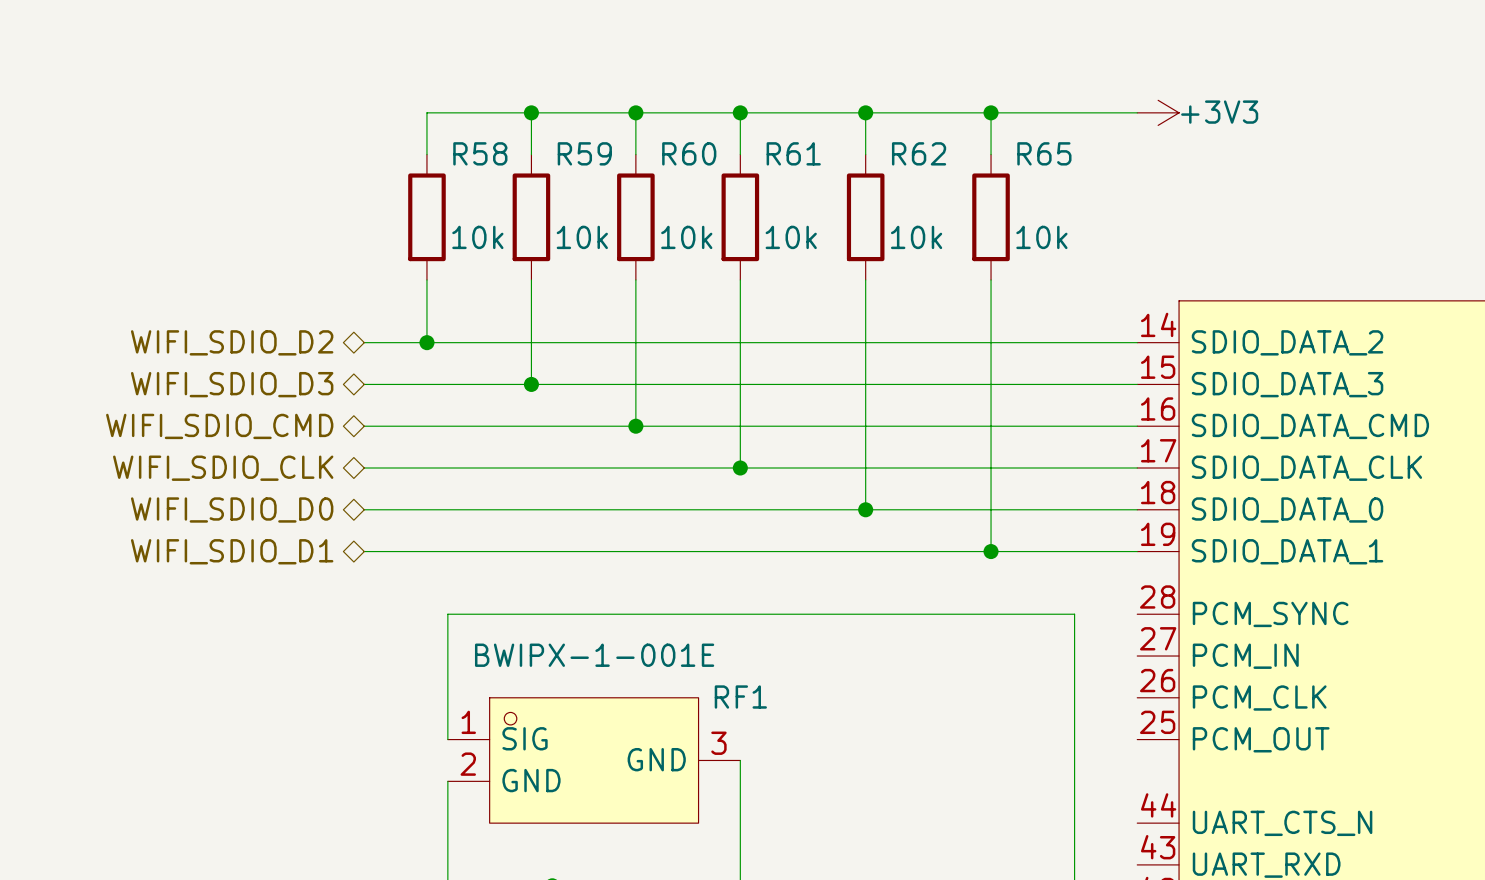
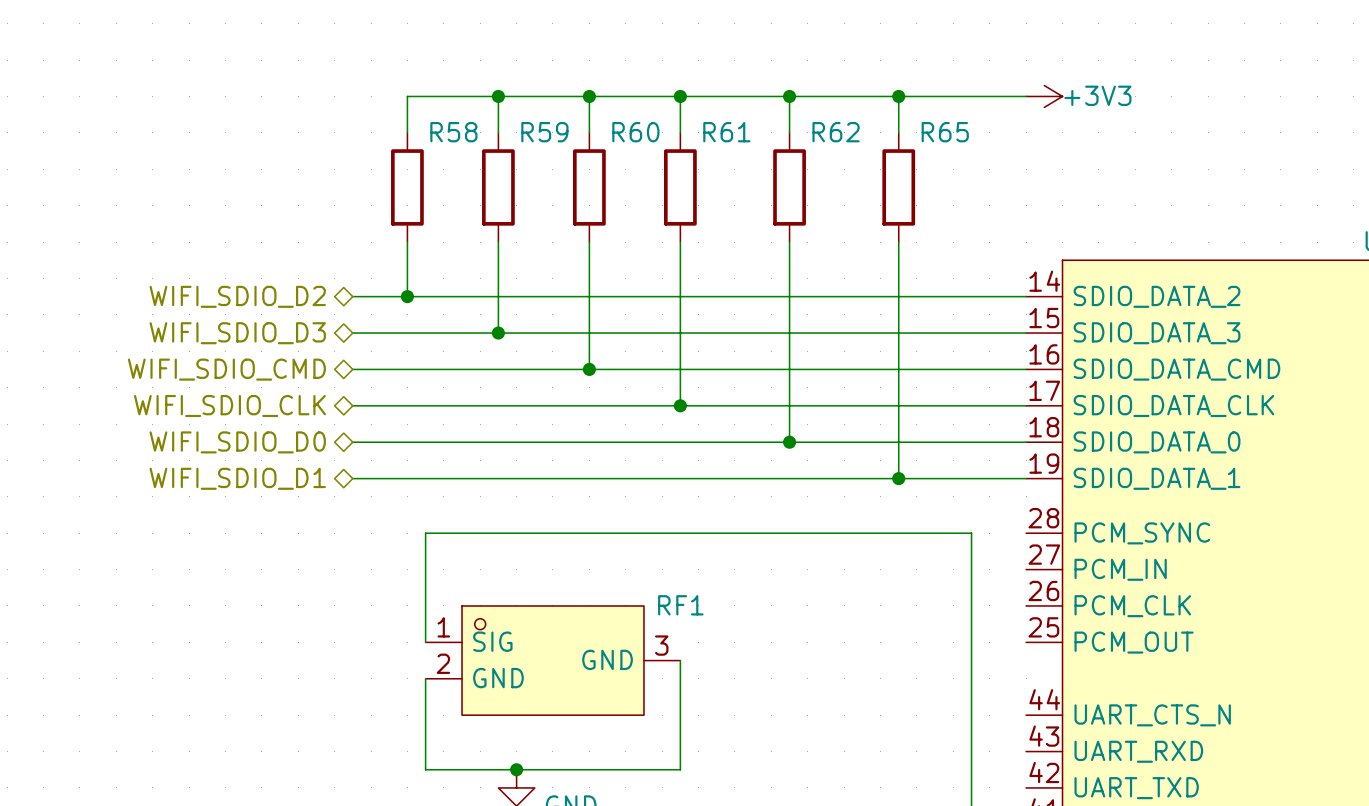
R58 value: 10k (477, 237) -> none
R59 value: 10k (582, 237) -> none
R60 value: 10k (686, 237) -> none
R61 value: 10k (791, 237) -> none
R62 value: 10k (916, 237) -> none
R65 value: 10k (1041, 237) -> none
RF1 value: BWIPX-1-001E (594, 655) -> none

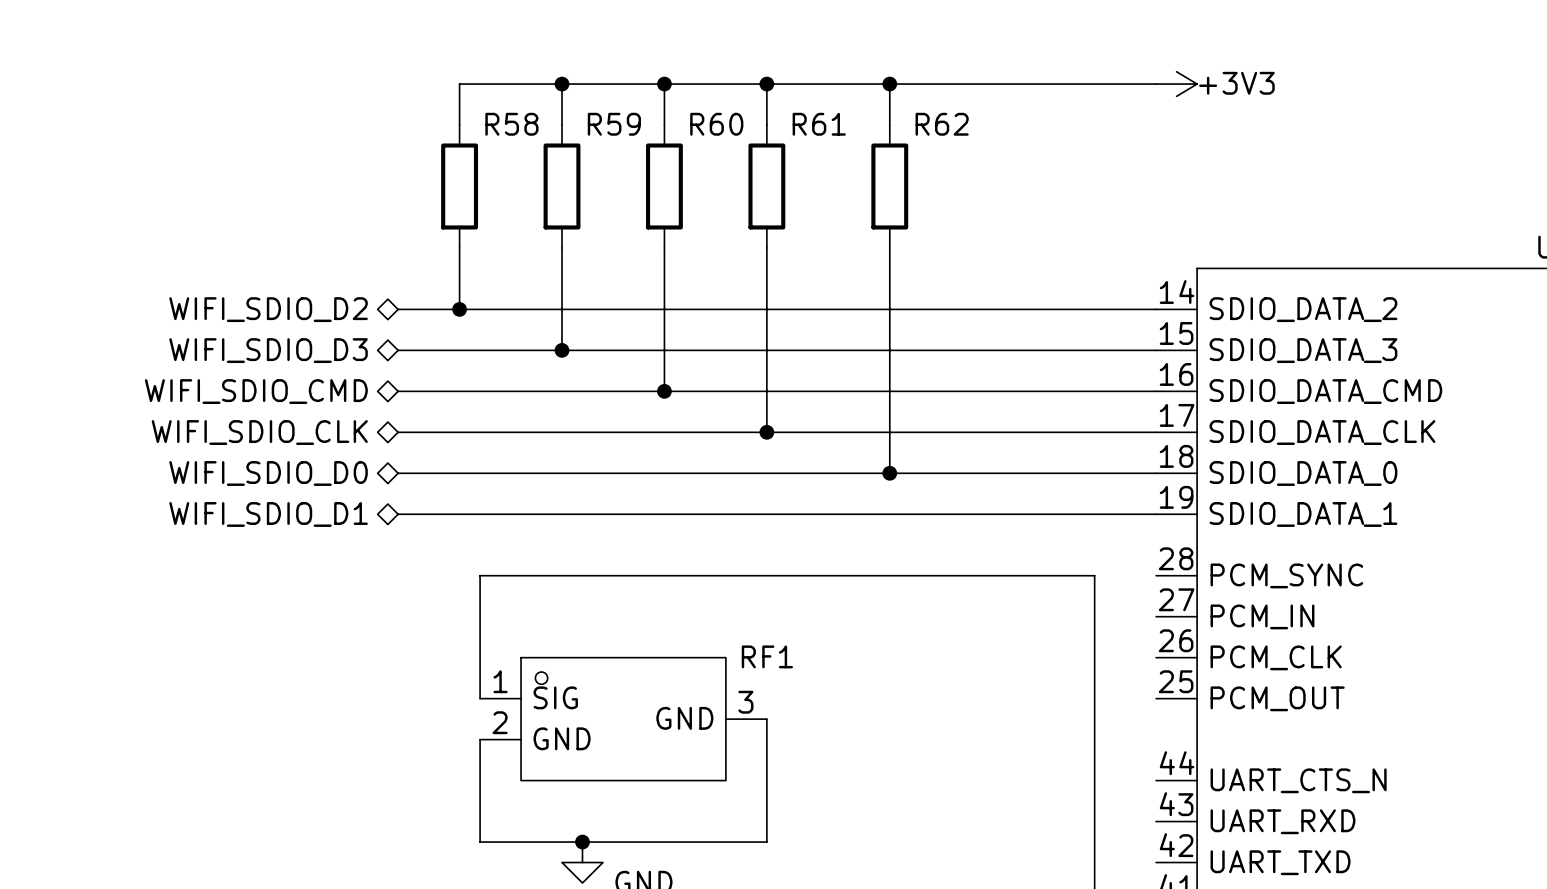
wire: (898, 96) (898, 132) -> none
junction: (898, 96) -> none
R65: (898, 187) -> none
wire: (898, 242) (898, 478) -> none
junction: (898, 478) -> none

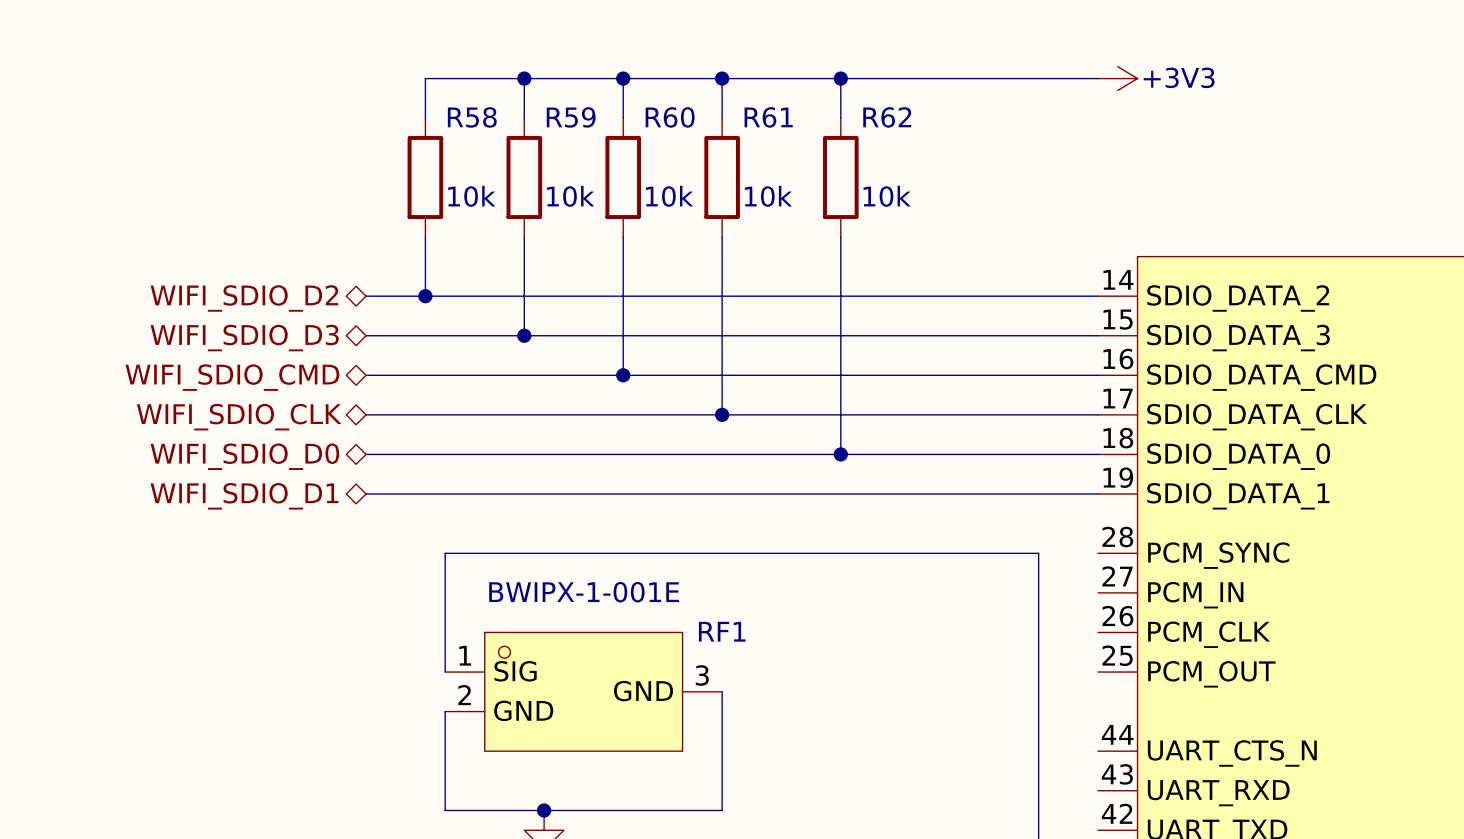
R58 value: none -> 10k (471, 196)
R59 value: none -> 10k (570, 196)
R60 value: none -> 10k (669, 196)
R61 value: none -> 10k (768, 196)
R62 value: none -> 10k (887, 196)
RF1 value: none -> BWIPX-1-001E (584, 592)

